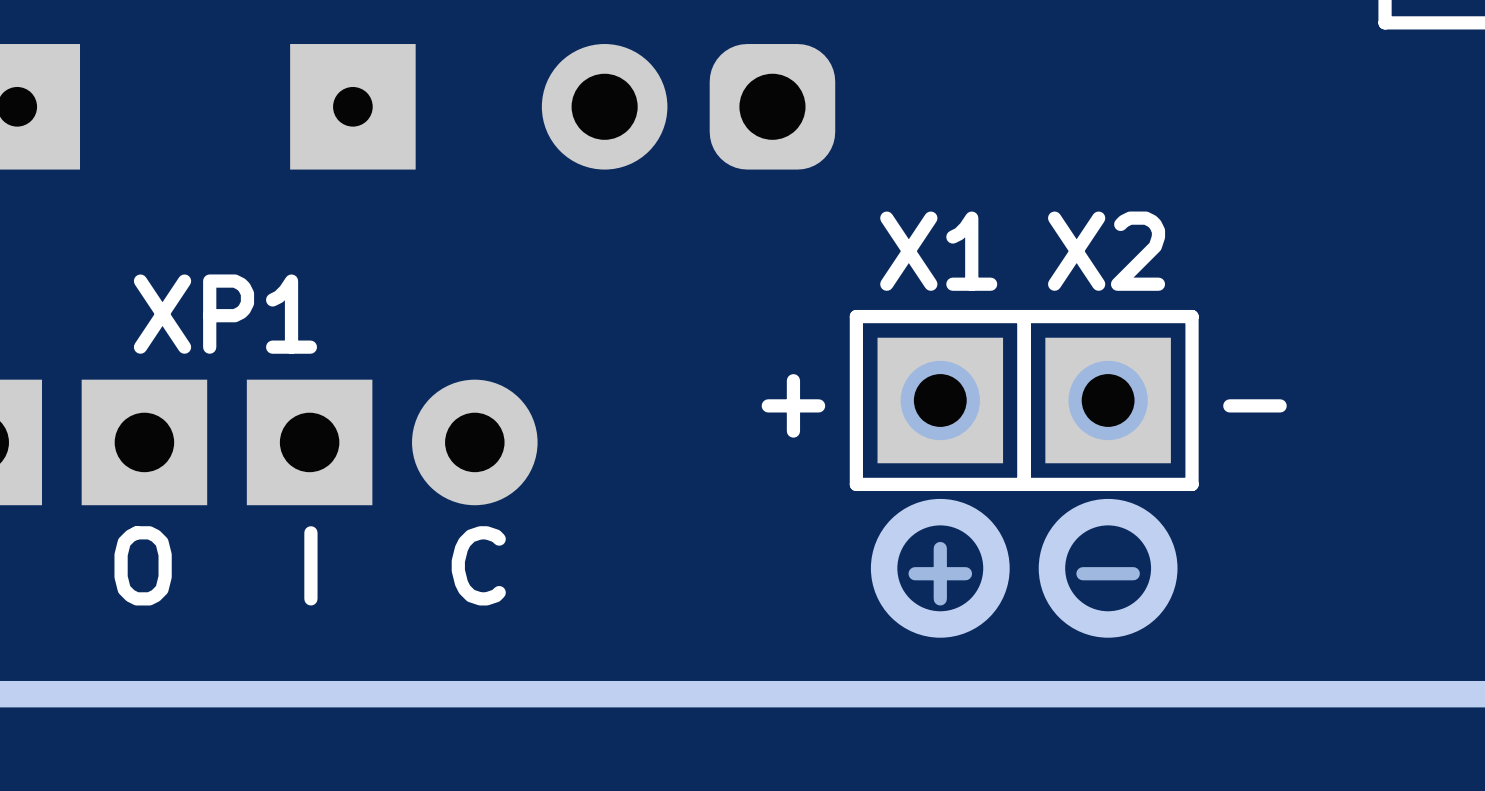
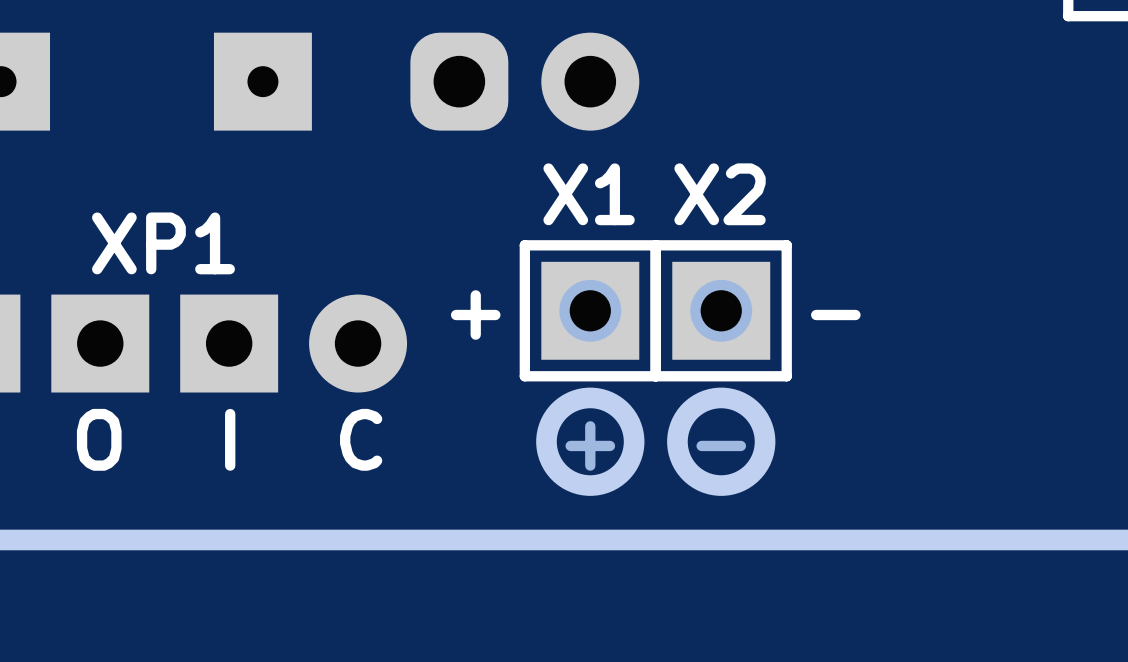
part rotation: 0° (688, 106) -> 180° (524, 81)
X1 name: X1 (938, 251) -> X2 (720, 194)
X1: none -> + (590, 310)
X2: - (1108, 400) -> none
text position: + (793, 405) -> + (475, 315)
text position: - (1254, 405) -> - (835, 315)
round board edge position: (1108, 568) -> (590, 441)
X1 value: + (940, 573) -> - (721, 445)

